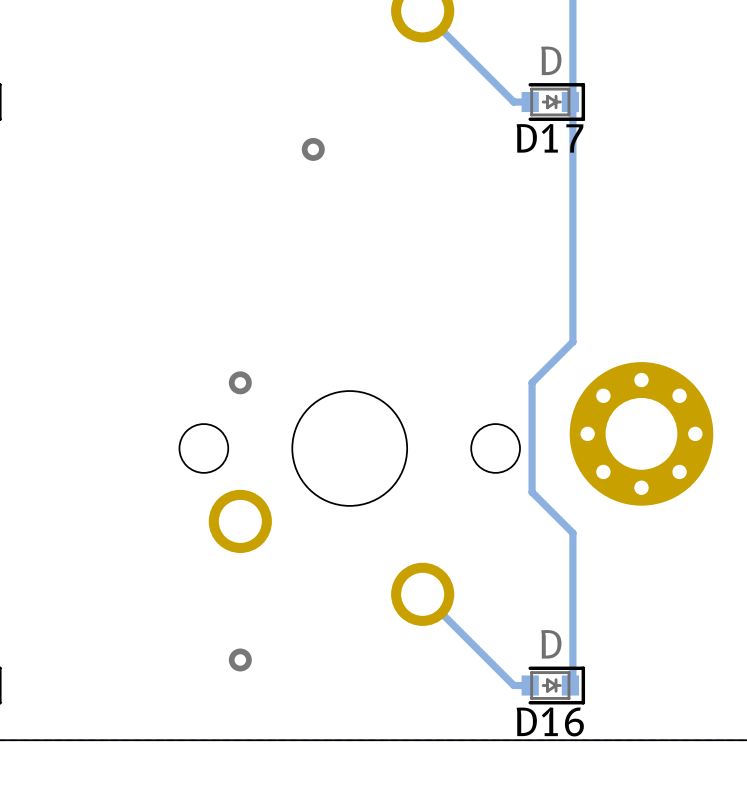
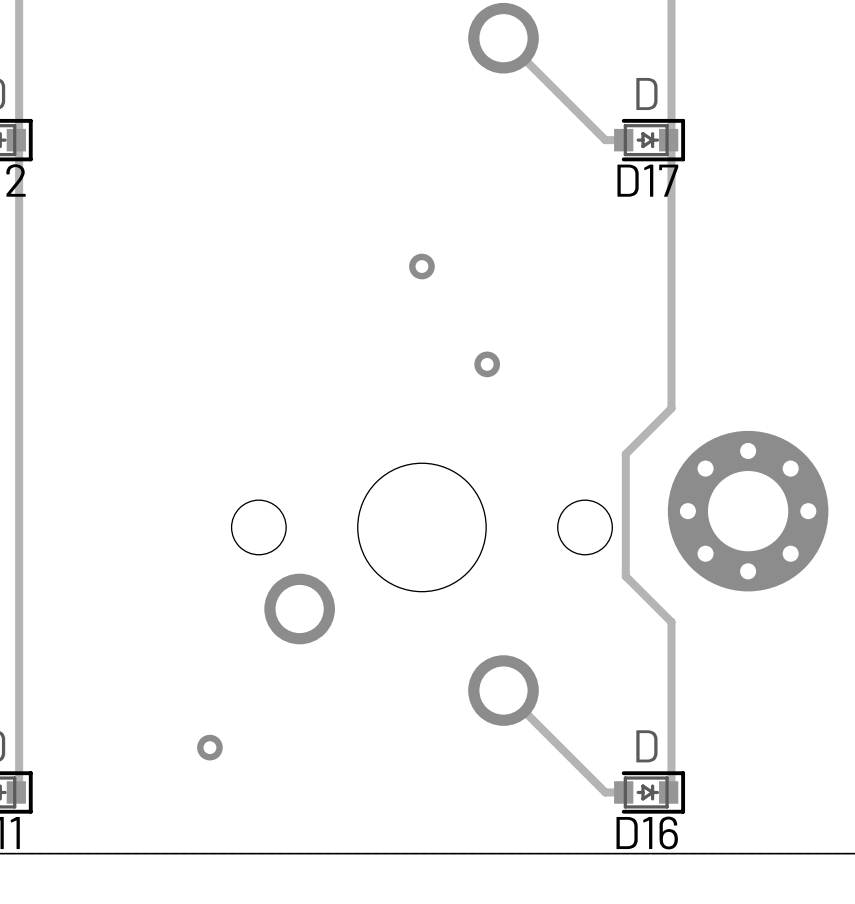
via position: (313, 149) -> (421, 266)
via: none -> (487, 364)
via: (240, 382) -> none
via position: (240, 659) -> (209, 747)

